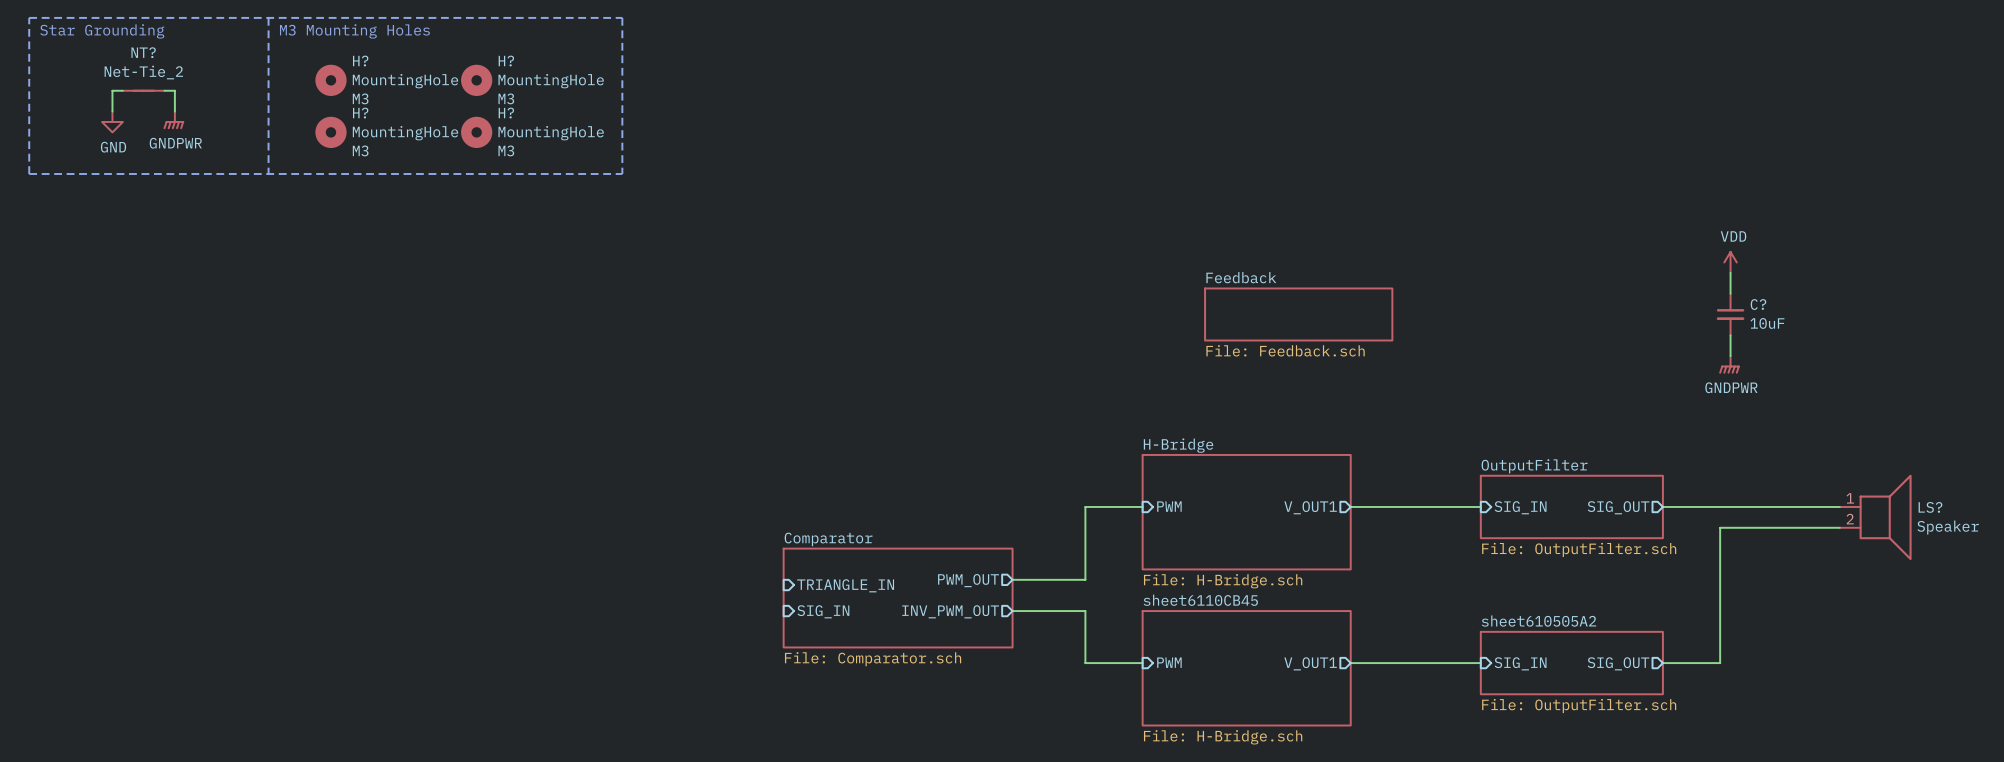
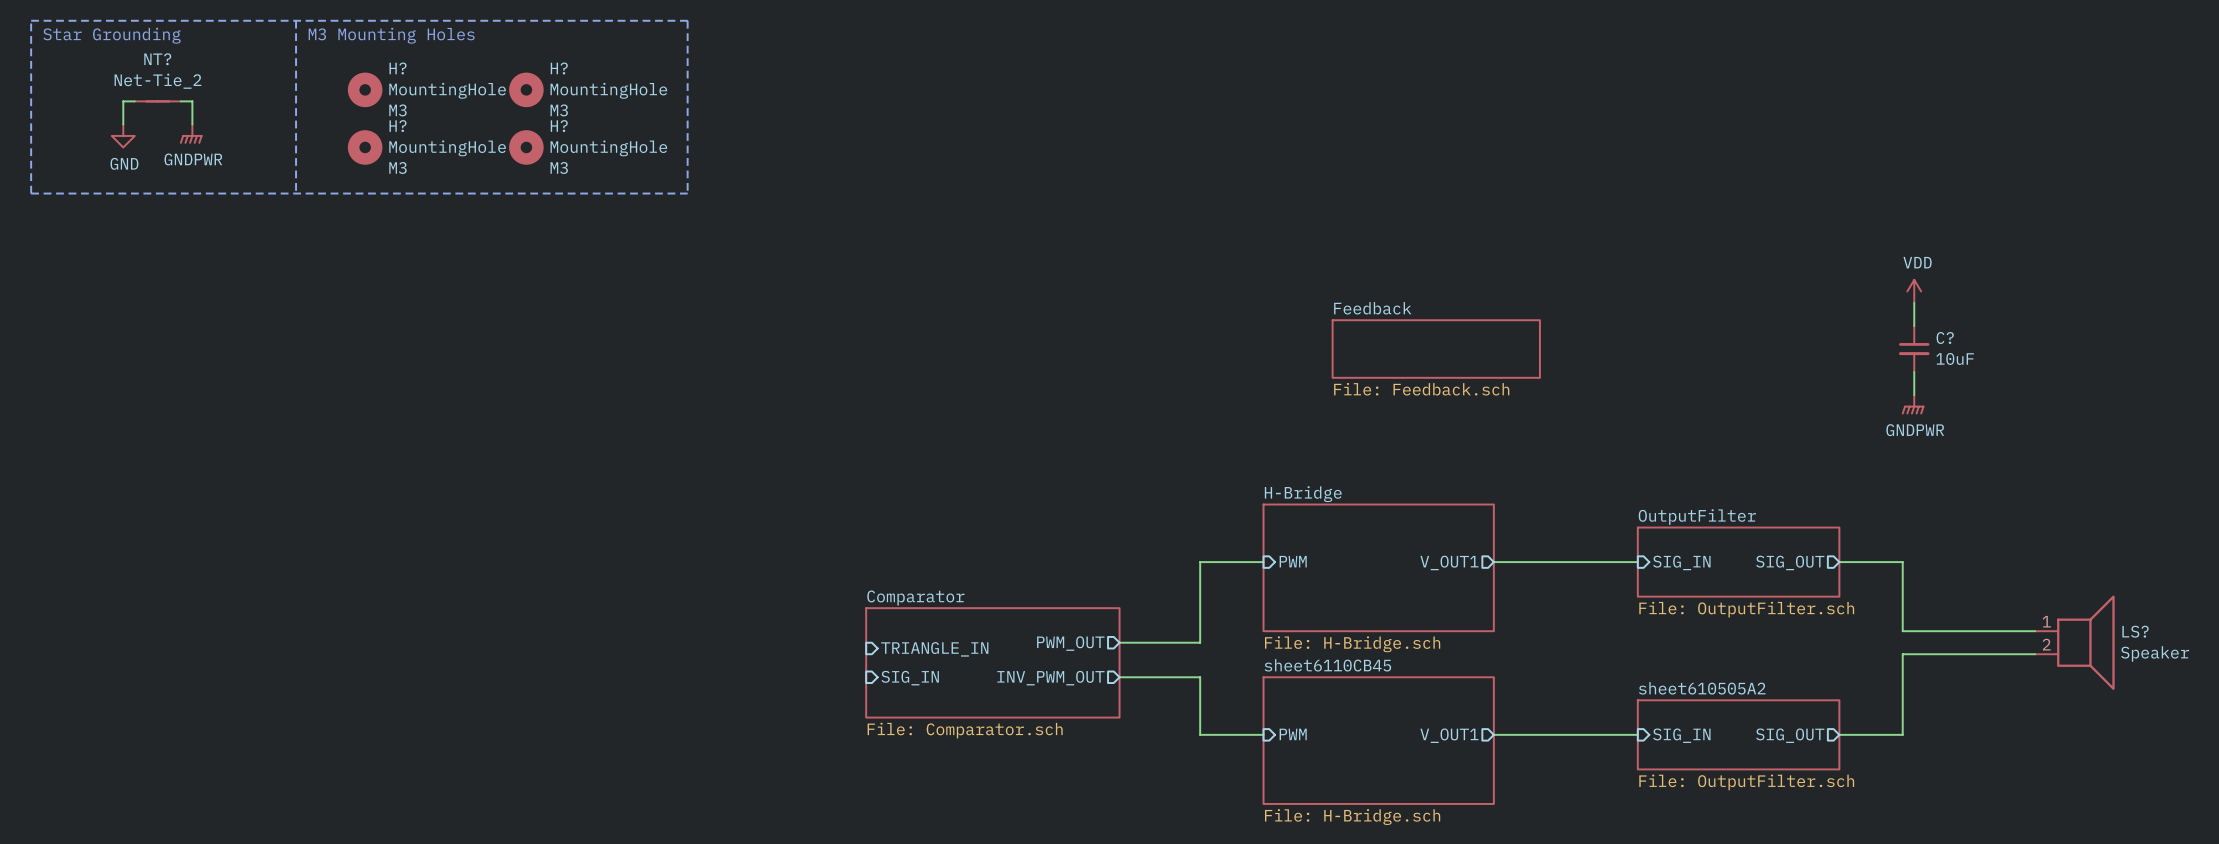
wire: (1720, 506) (1839, 506) -> (1902, 562) (1902, 585)
LS? position: (1875, 517) -> (2074, 642)
wire: (1720, 527) (1839, 527) -> (1902, 654) (2035, 654)
wire: (1720, 569) (1720, 590) -> (1902, 631) (2035, 631)

